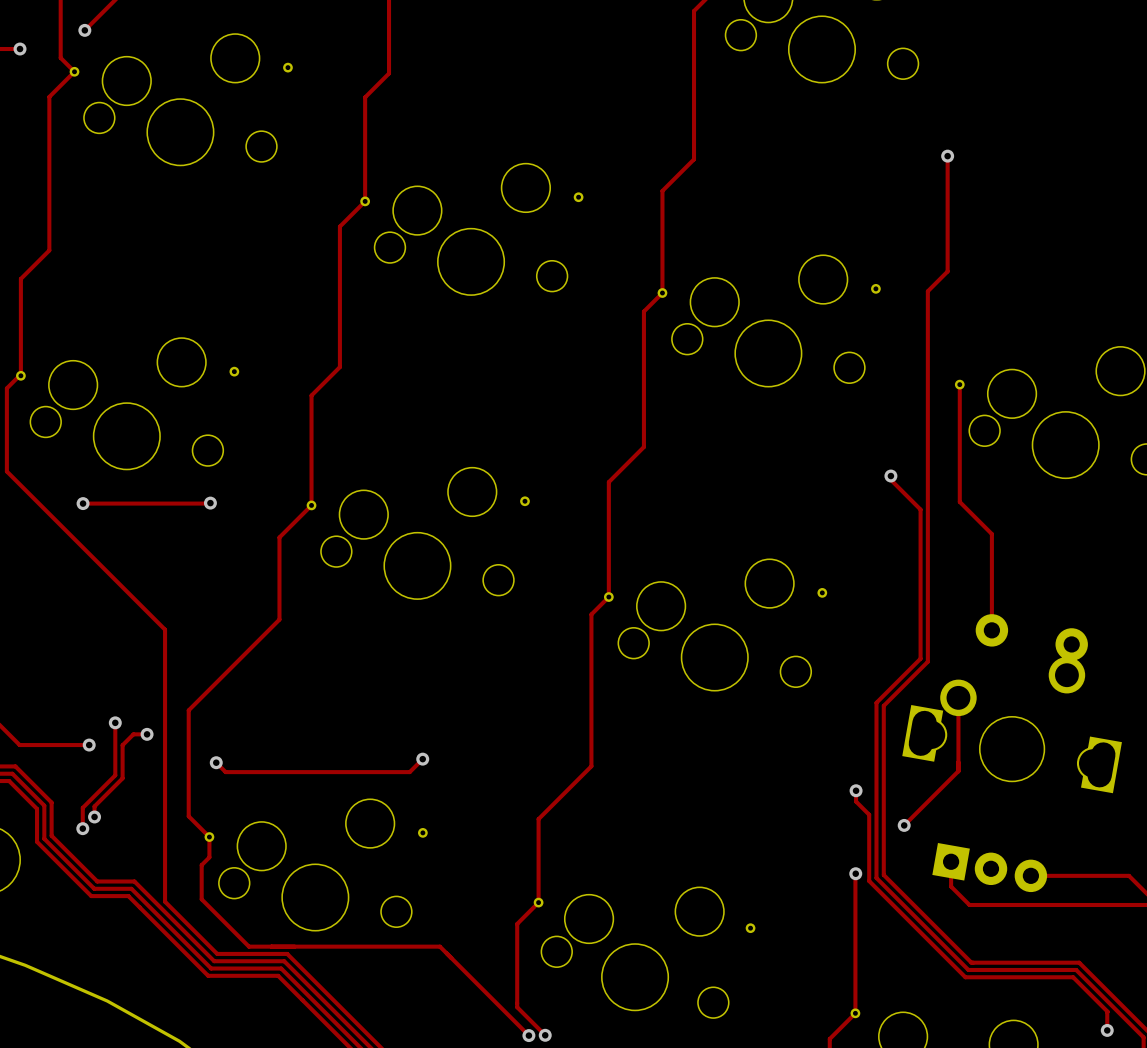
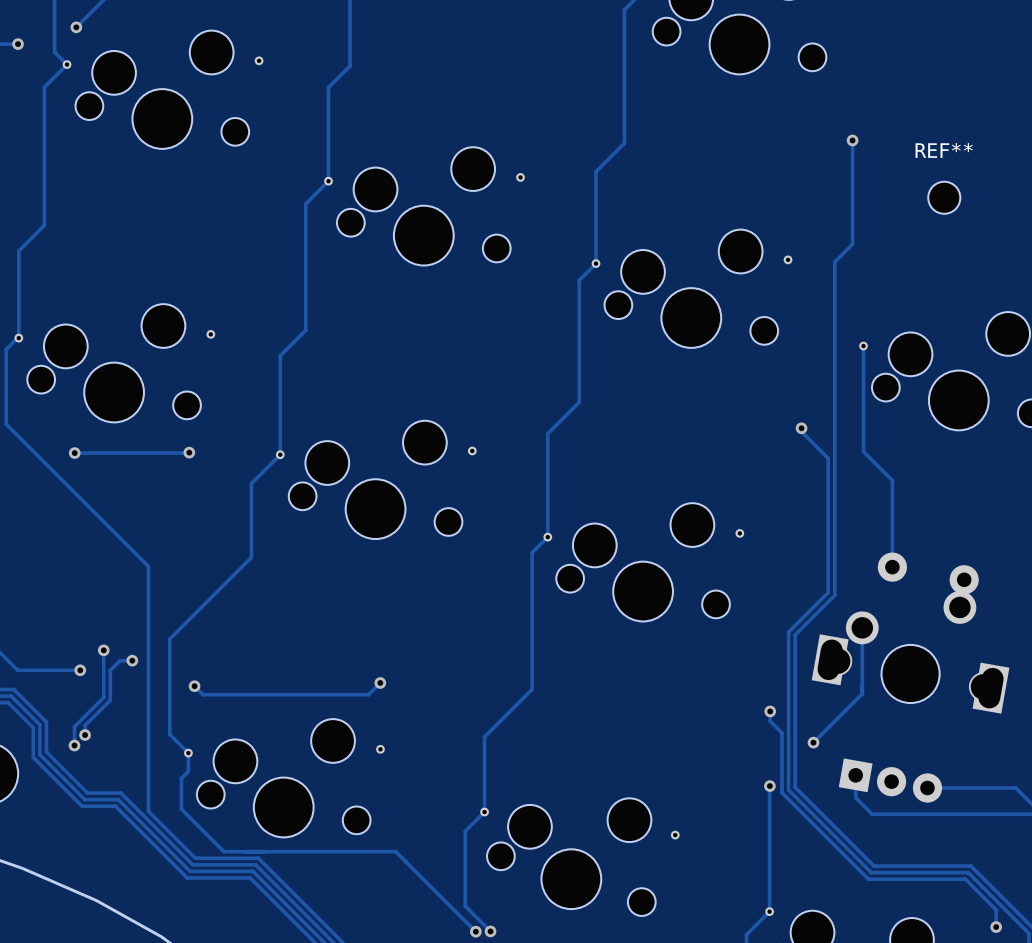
REF**: none -> (944, 197)

